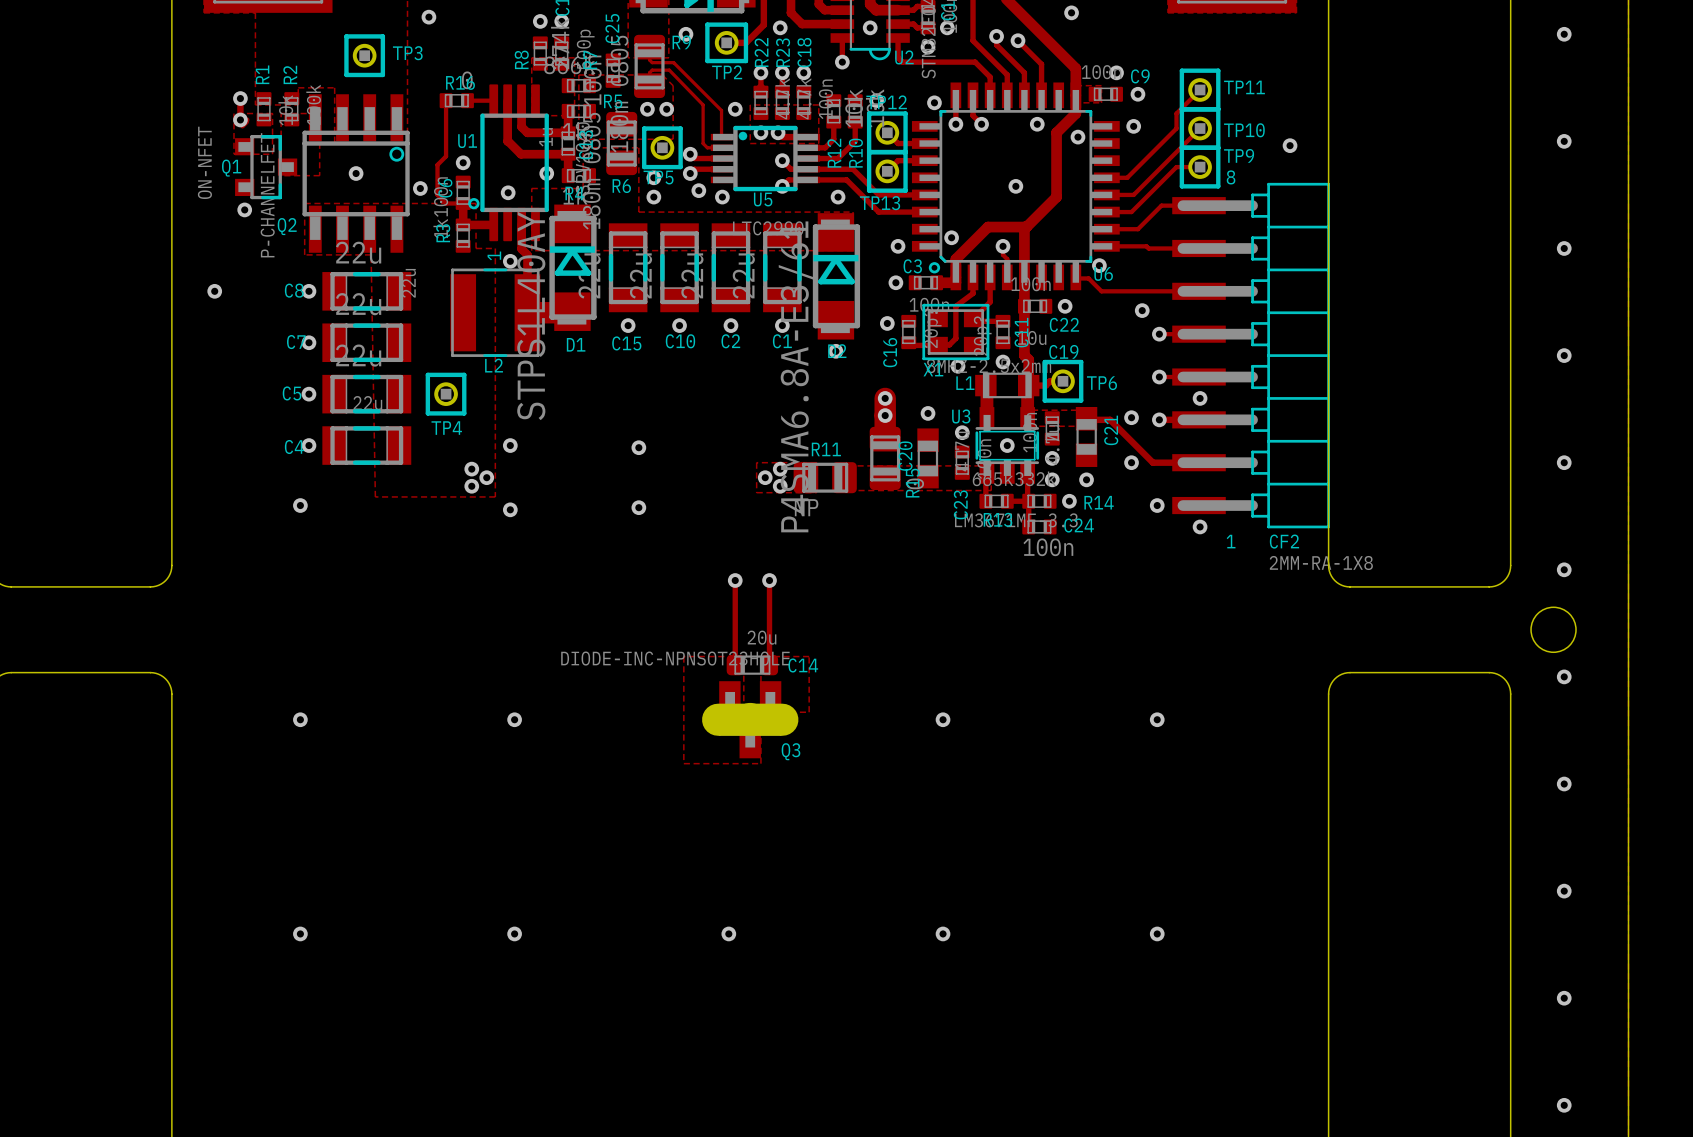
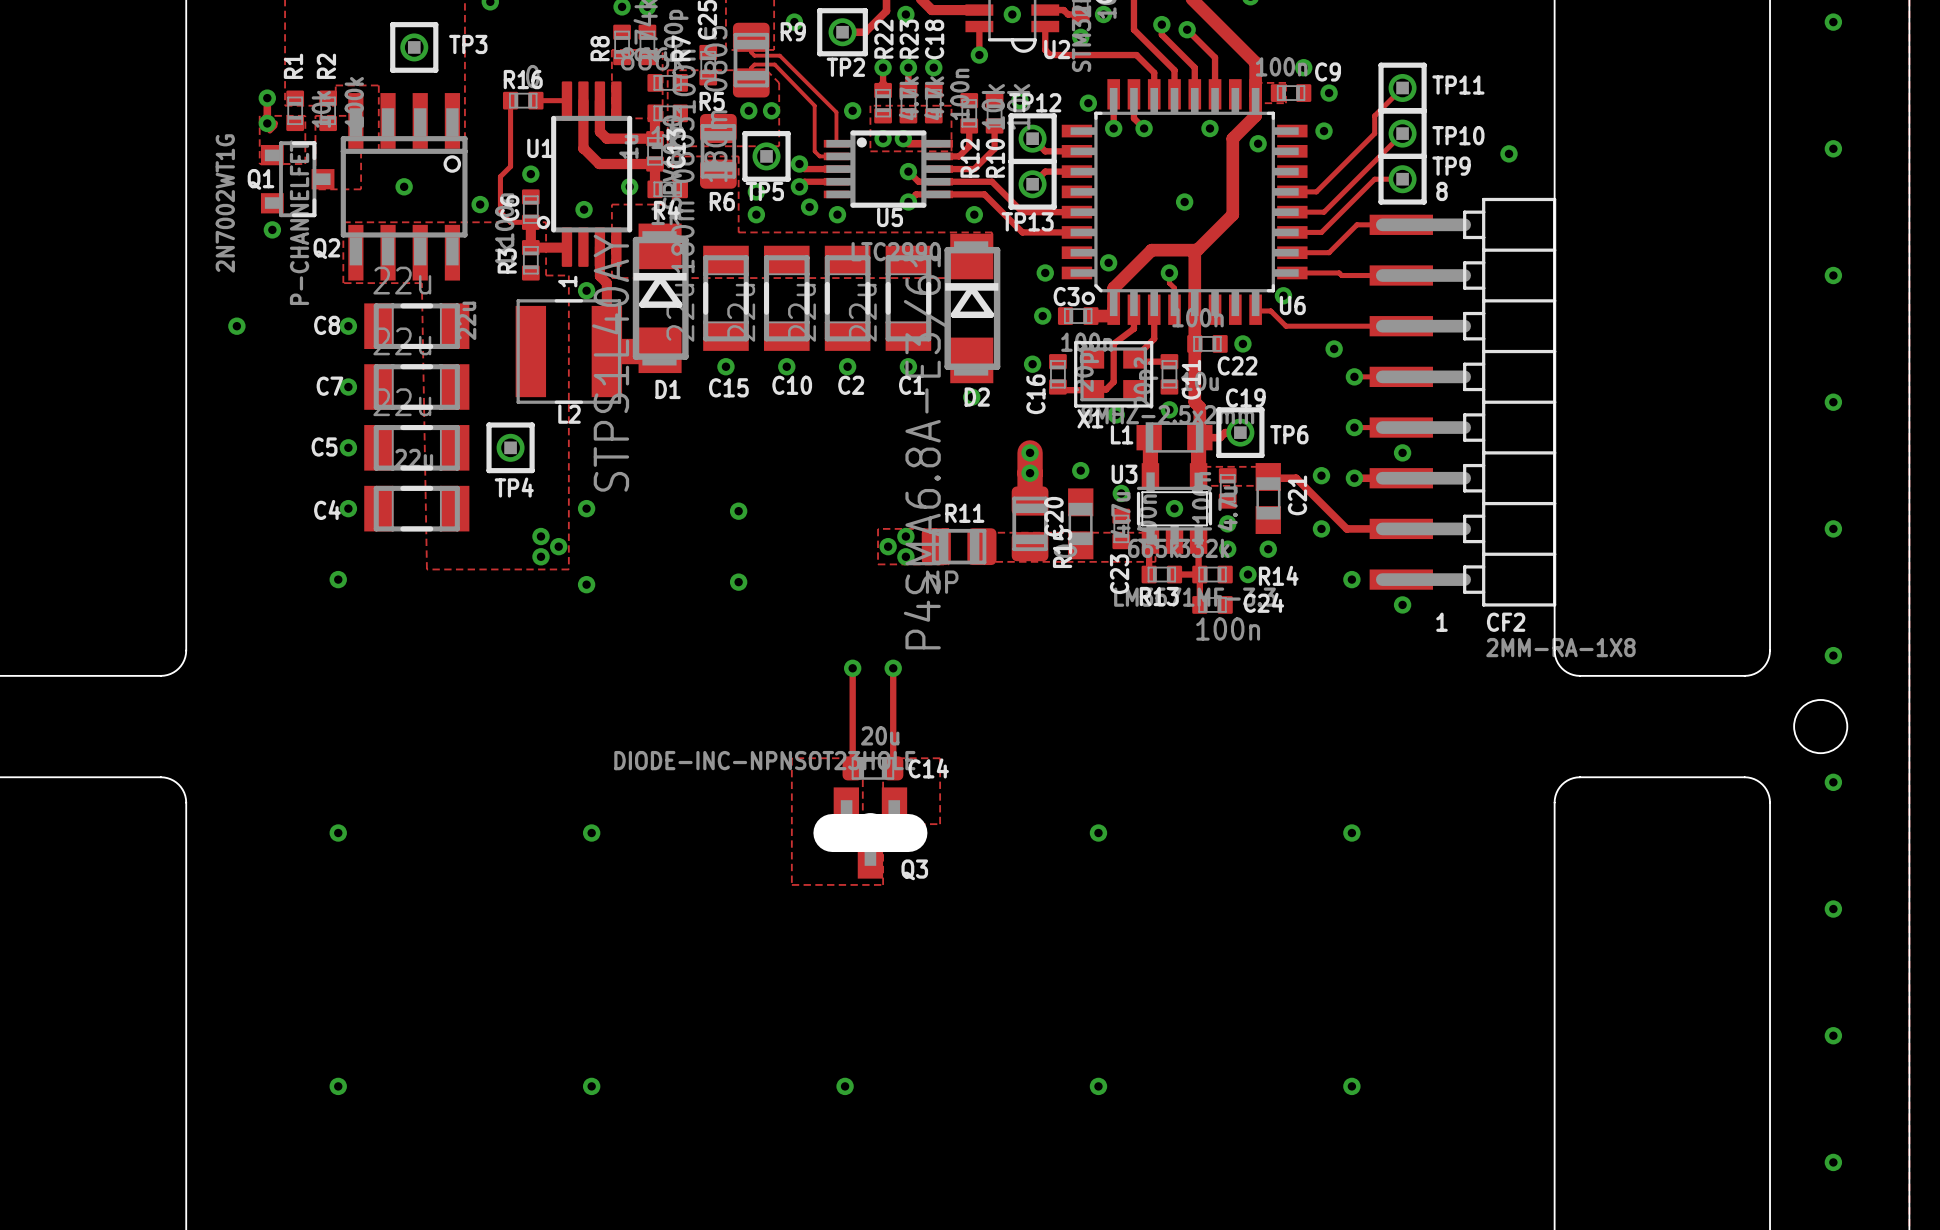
Q1 value: ON-NFET (204, 162) -> 2N7002WT1G (225, 203)

